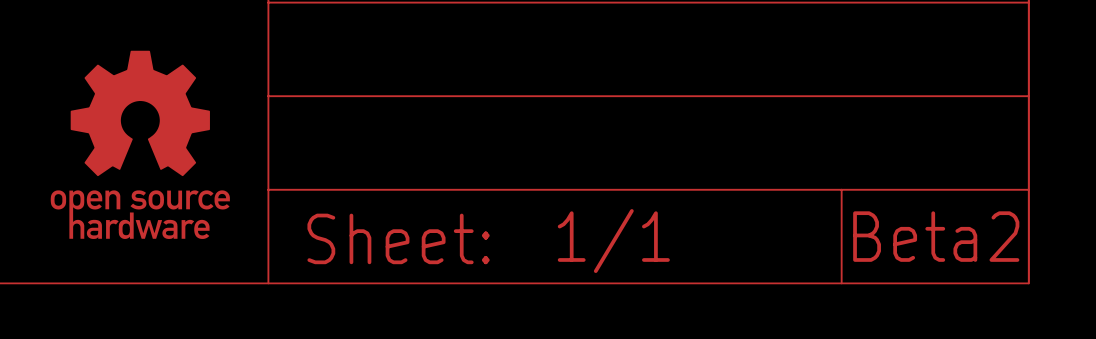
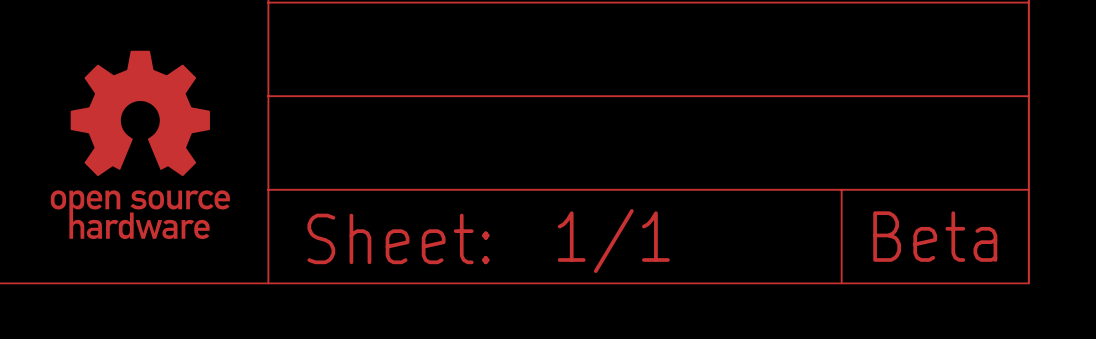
text: Beta2 (936, 236) -> Beta (935, 236)

